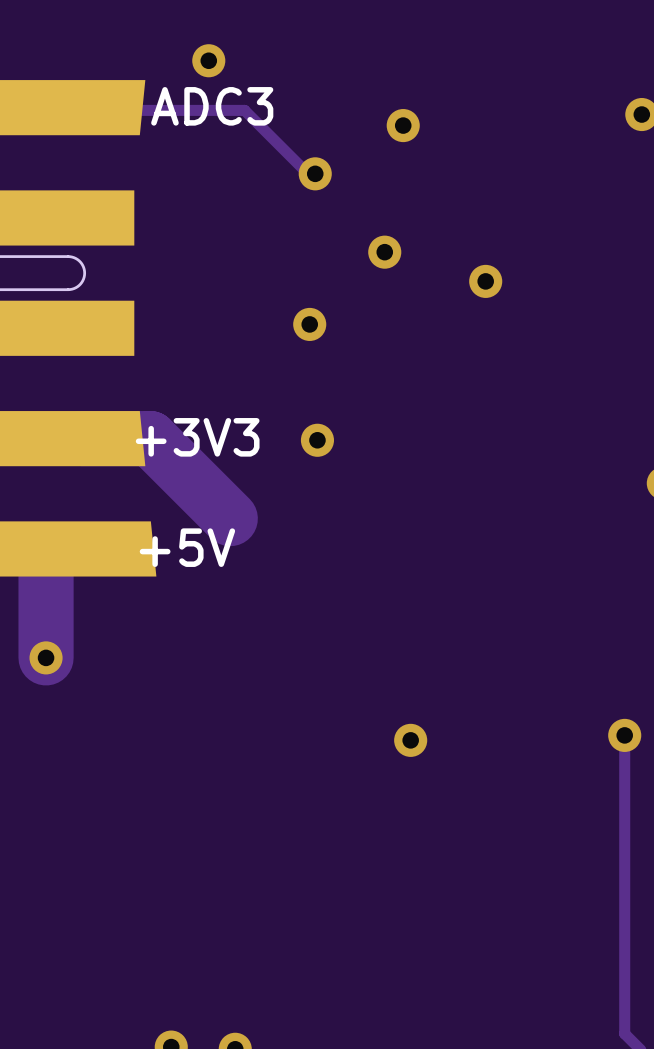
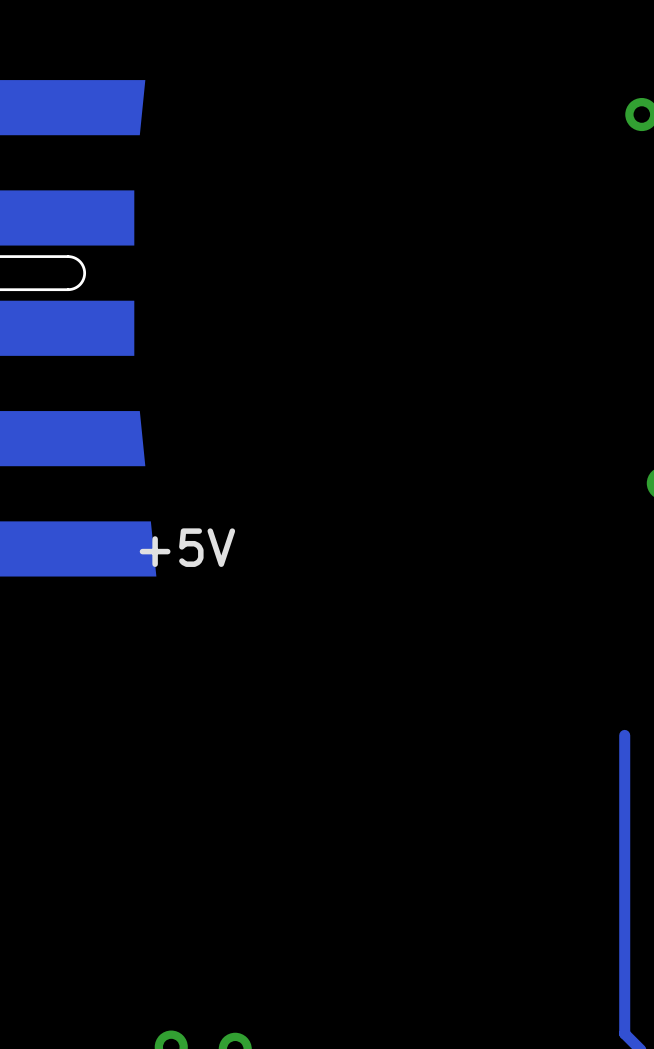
via: (208, 60) -> none
text: ADC3 (212, 106) -> none
track: (40, 107) (43, 110) (244, 110) (308, 173) (315, 173) -> none
via: (403, 125) -> none
via: (315, 173) -> none
via: (384, 252) -> none
via: (485, 281) -> none
via: (309, 324) -> none
text: +3V3 (197, 437) -> none
track: (81, 438) (150, 438) (230, 518) -> none
via: (317, 440) -> none
track: (46, 555) (46, 657) -> none
via: (46, 657) -> none
via: (624, 735) -> none
via: (410, 740) -> none

